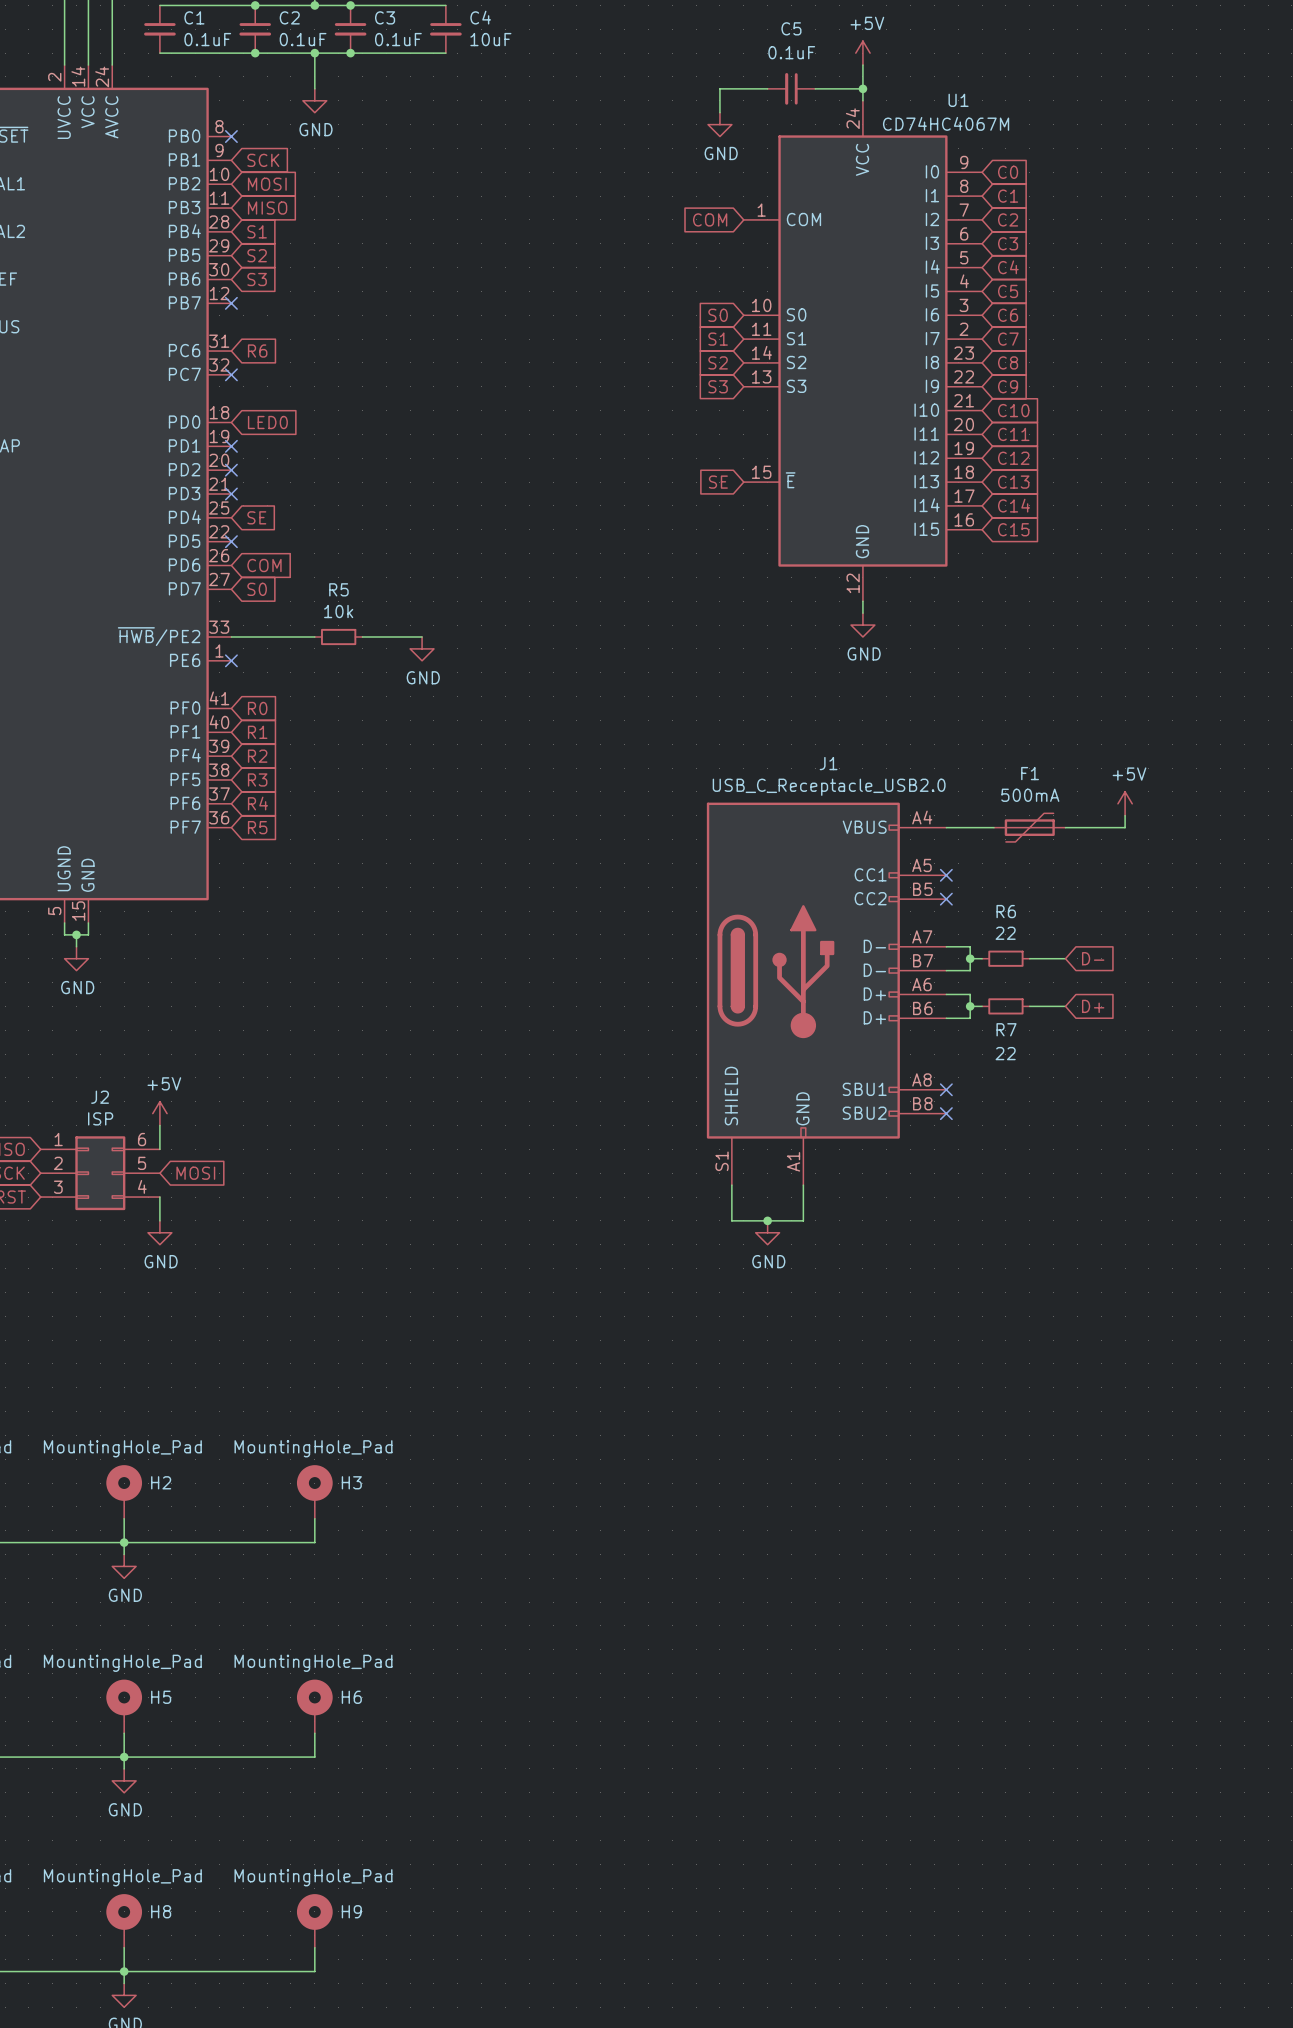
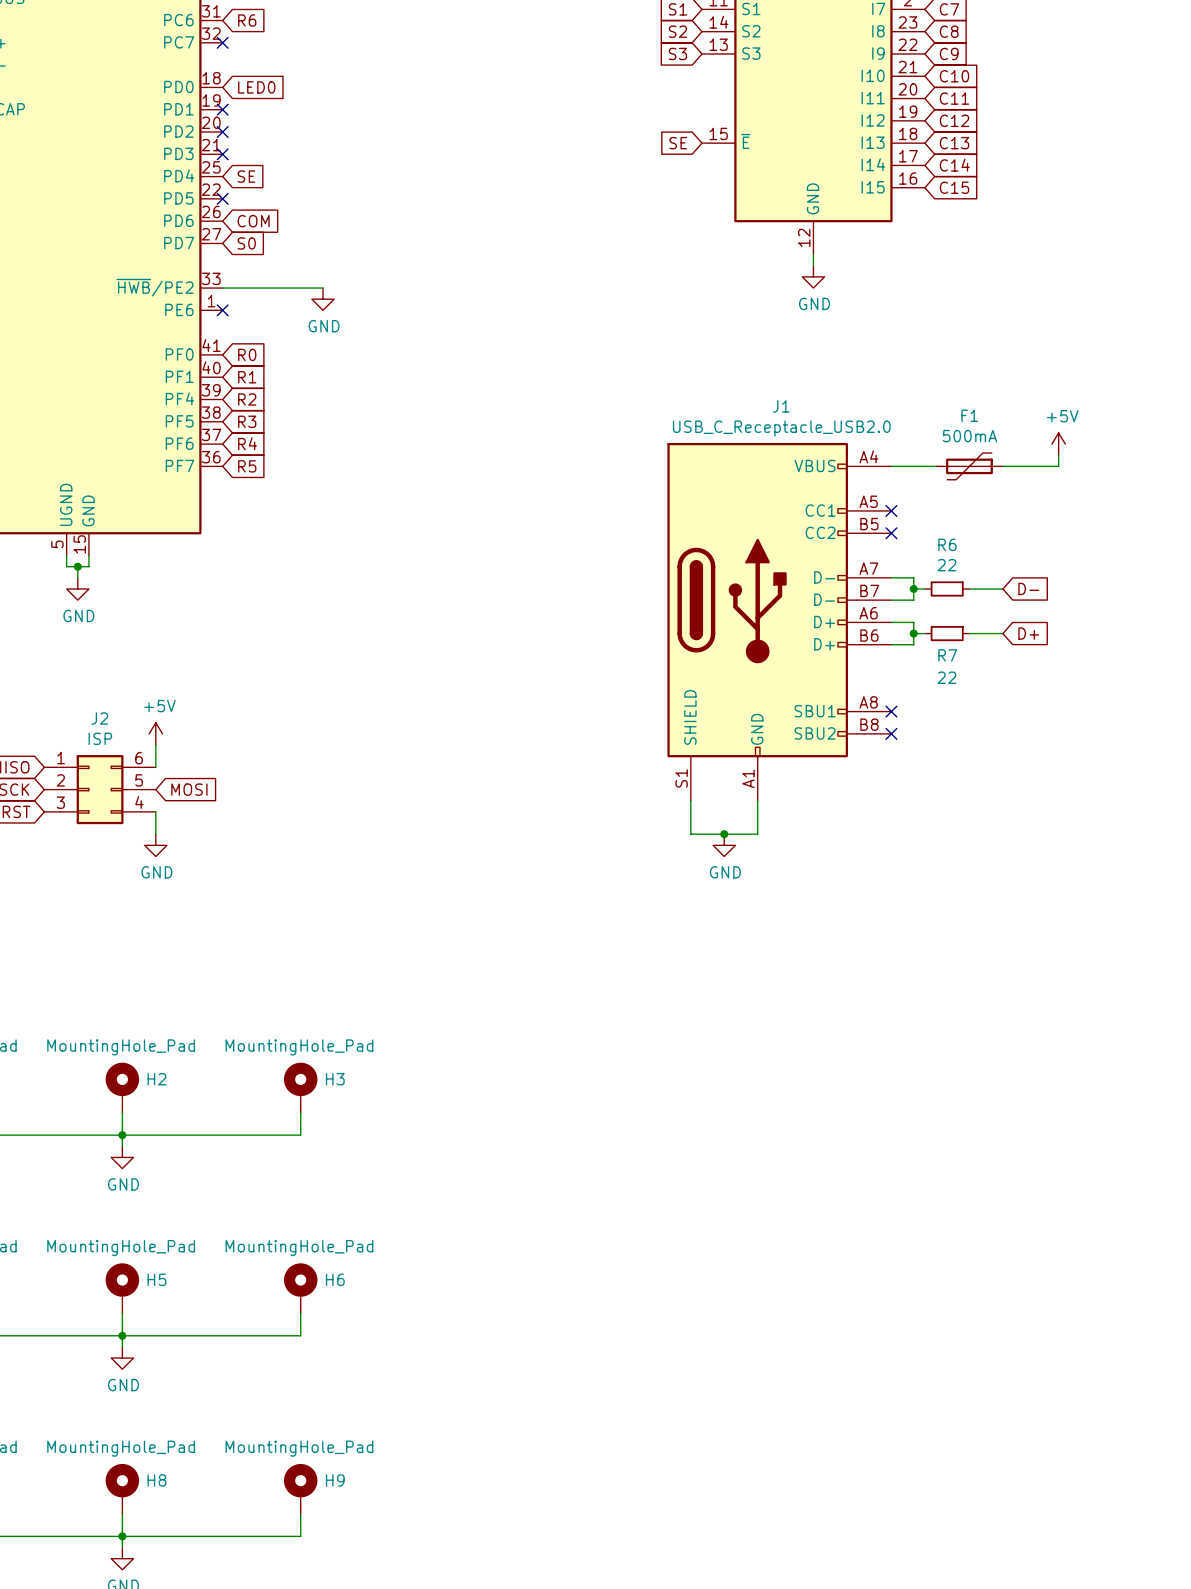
wire: none -> (300, 288) (323, 288)
R5: 10k (338, 636) -> none
wire: (362, 636) (422, 636) -> none
power symbol position: GND (422, 648) -> GND (323, 299)

